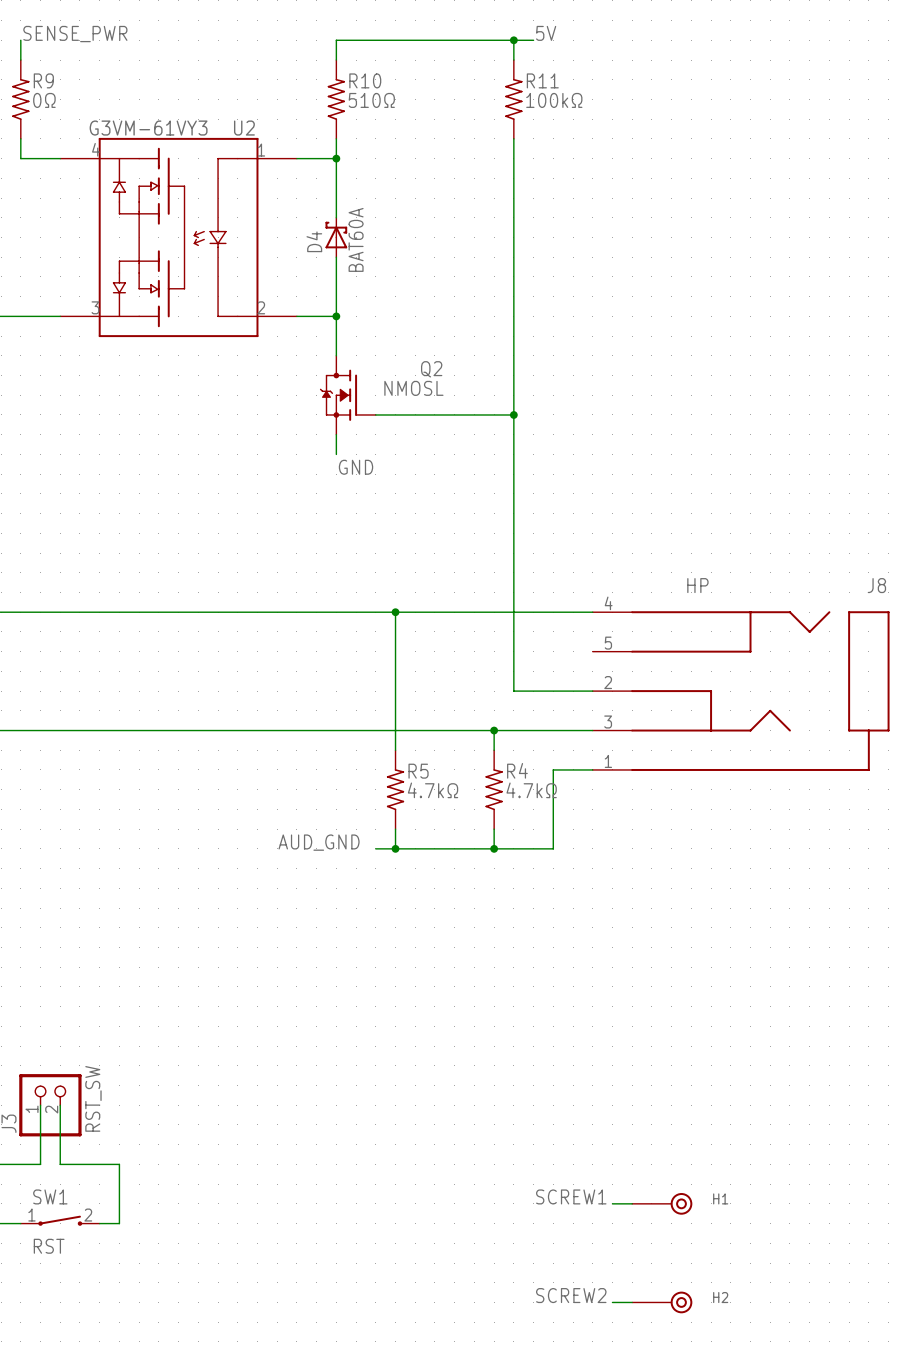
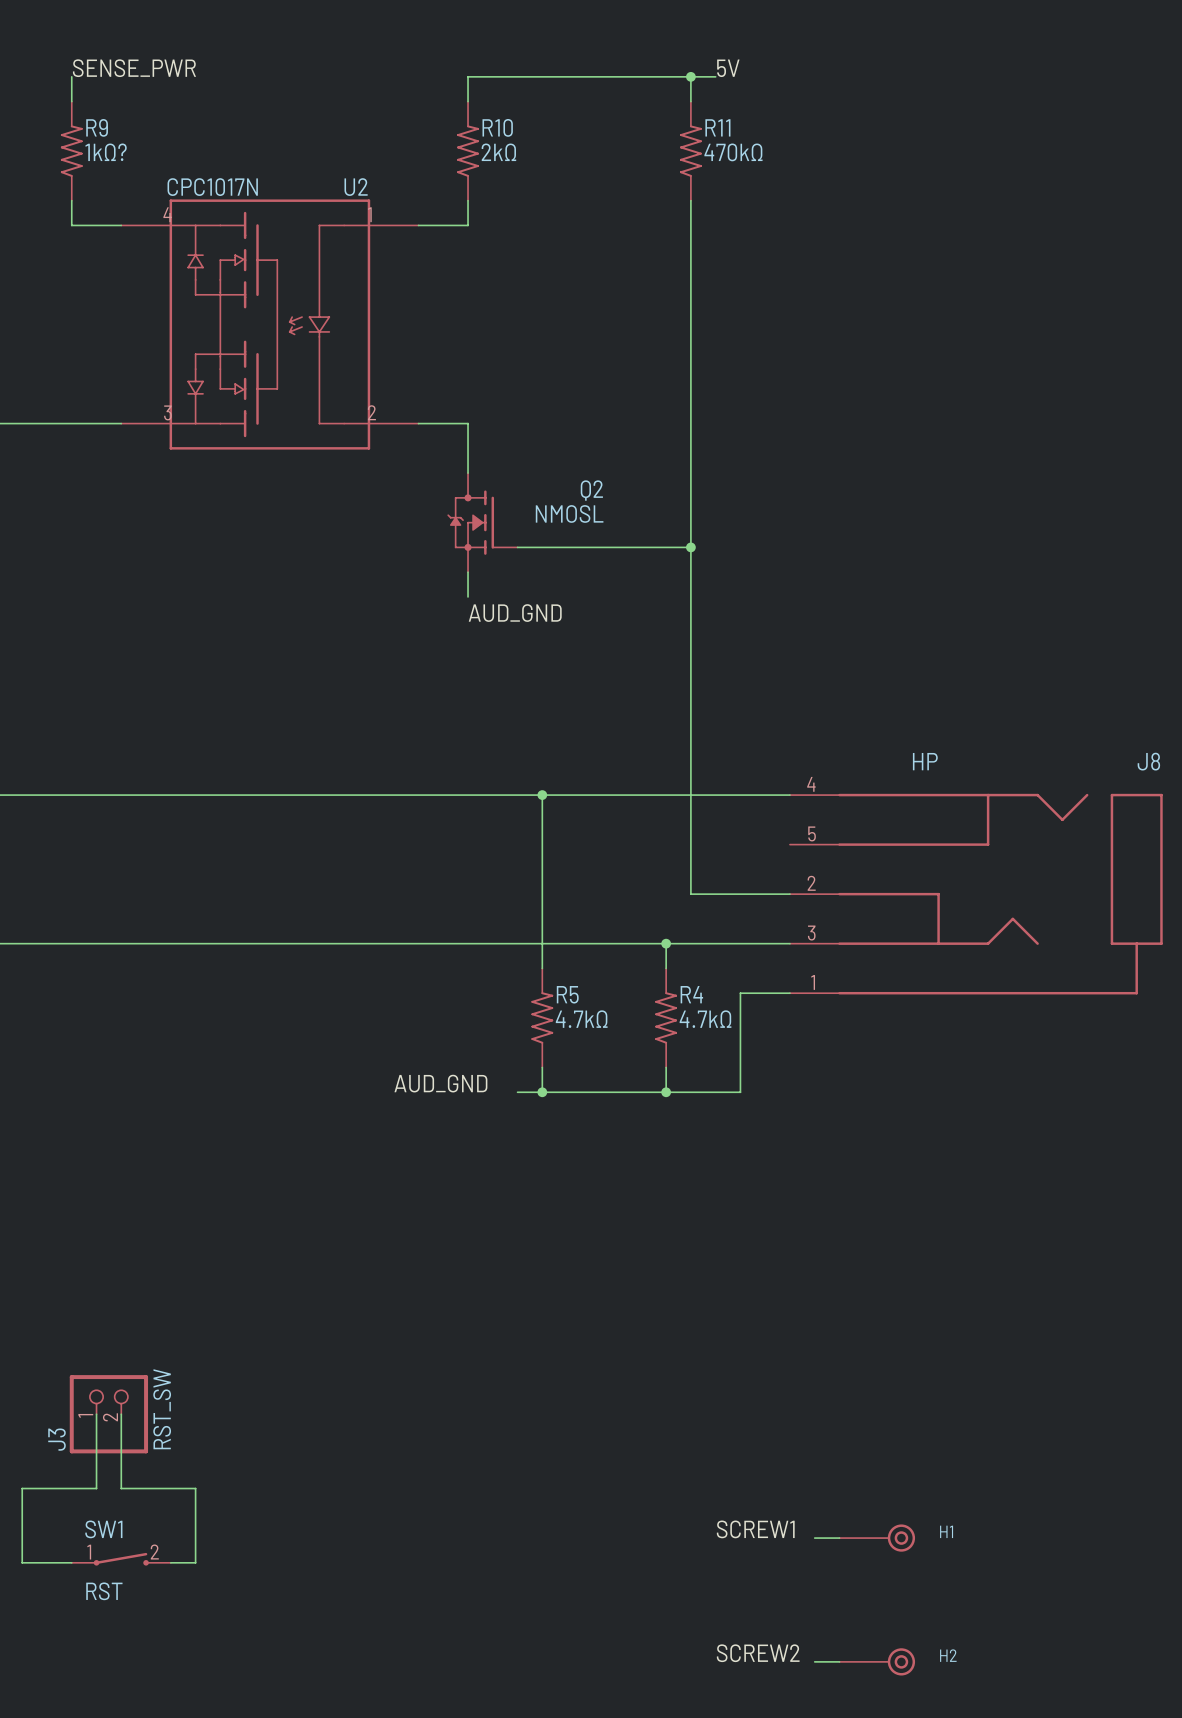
R9 value: 0Ω (44, 100) -> 1kΩ? (106, 152)
R10 value: 510Ω (371, 100) -> 2kΩ (498, 152)
R11 value: 100kΩ (554, 100) -> 470kΩ (733, 152)
U2 value: G3VM-61VY3 (148, 128) -> CPC1017N (212, 187)
wire: (336, 158) (336, 217) -> none
junction: (336, 158) -> none
D4: BAT60A (336, 237) -> none
wire: (336, 257) (336, 316) -> none
junction: (336, 316) -> none
label: GND (356, 467) -> AUD_GND (515, 613)

